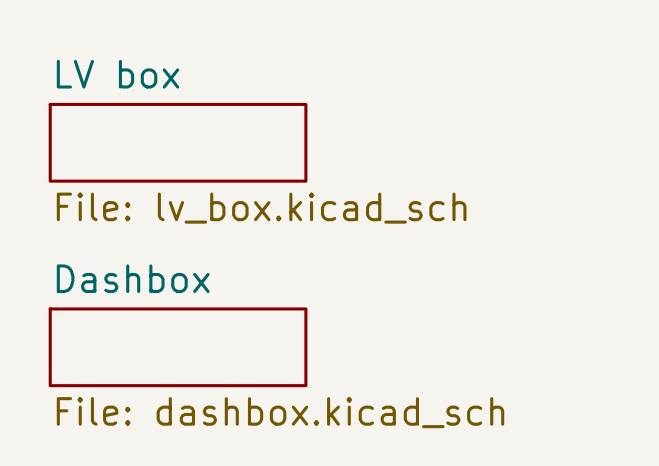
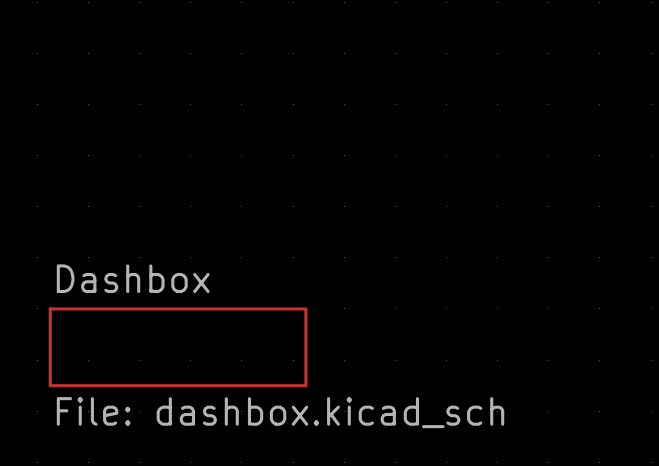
sheet LV box: File: lv_box.kicad_sch (178, 142) -> none

